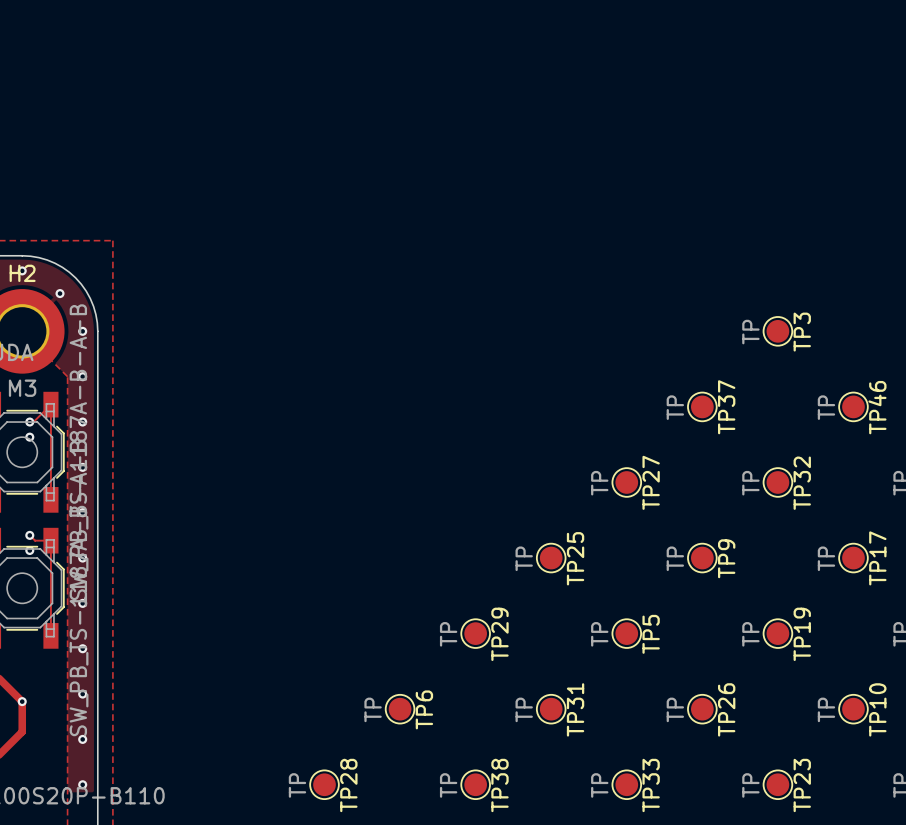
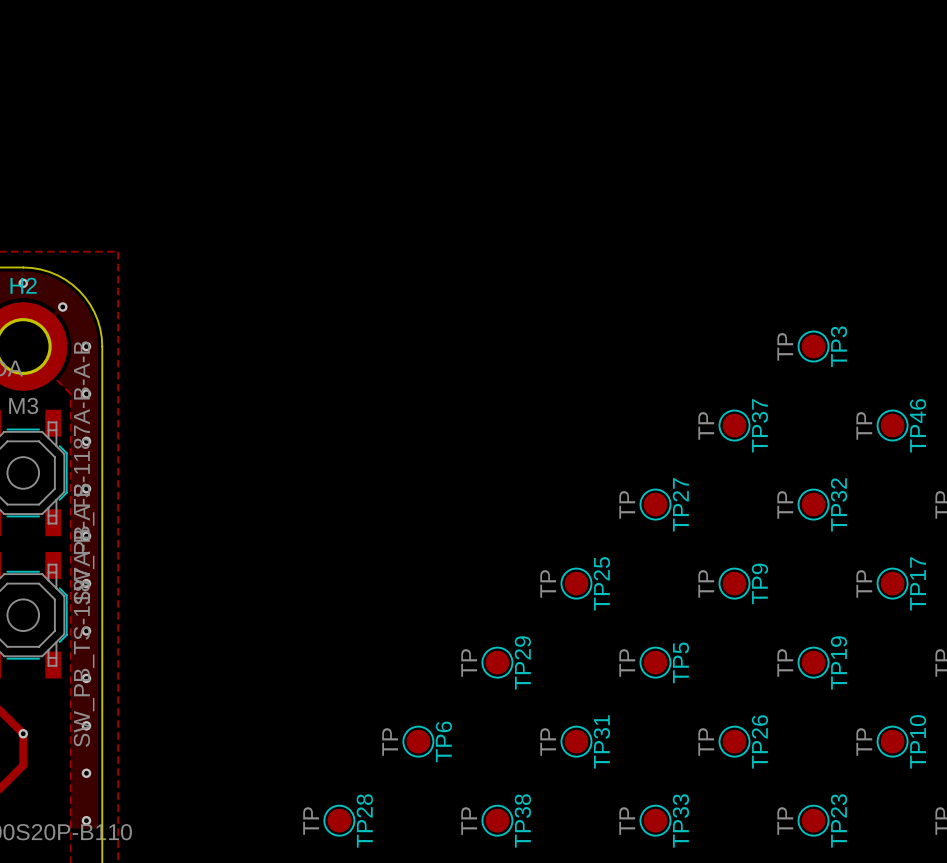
track: (29, 422) (33, 422) (50, 404) (50, 499) -> none
via: (29, 422) -> none
via: (29, 437) -> none
track: (29, 535) (35, 540) (50, 540) (50, 635) -> none
via: (29, 535) -> none
via: (29, 550) -> none

